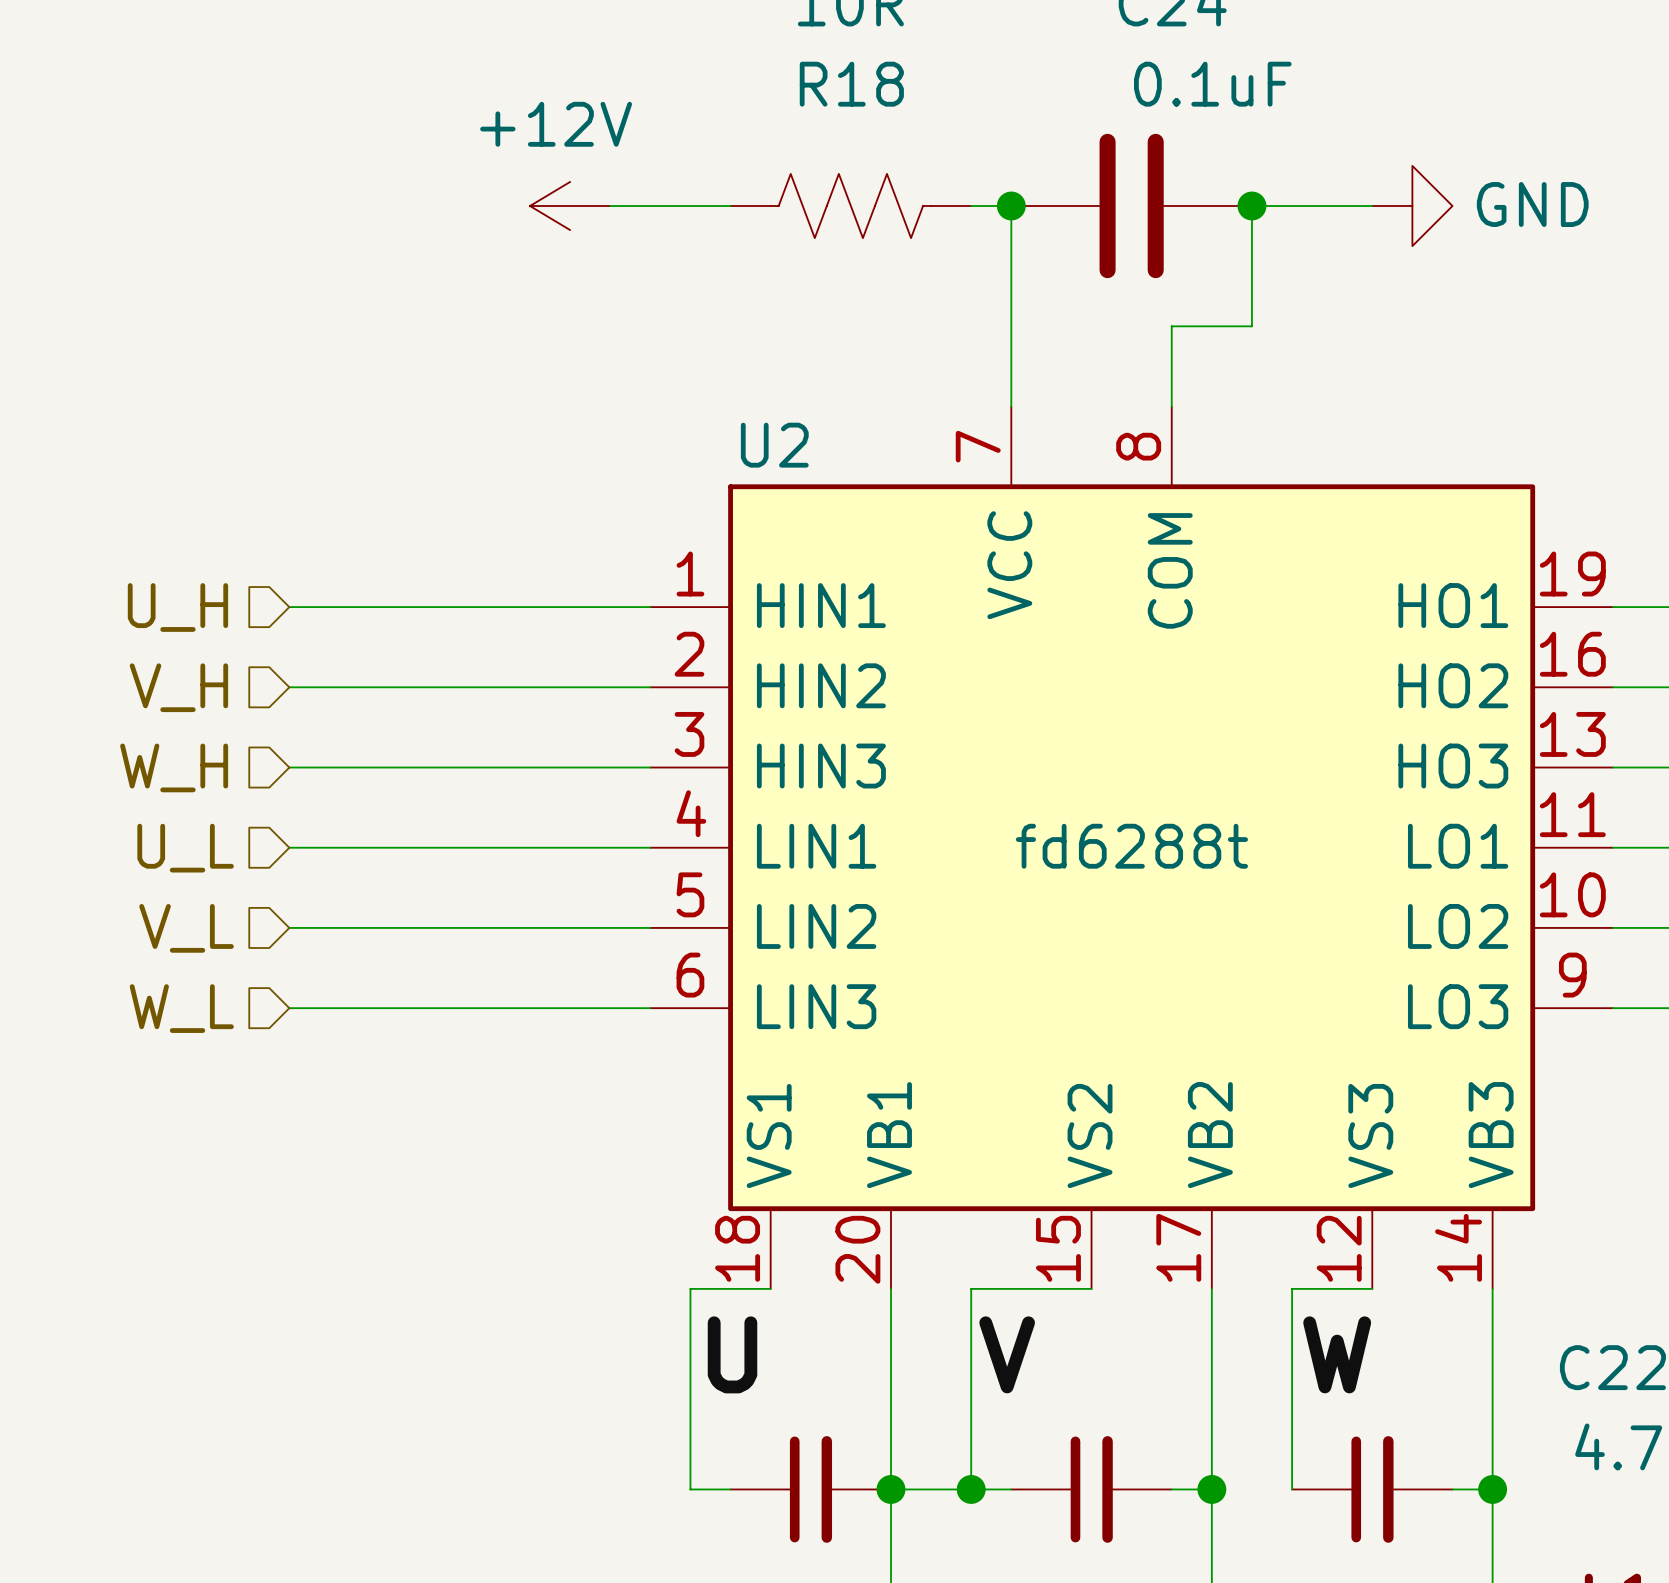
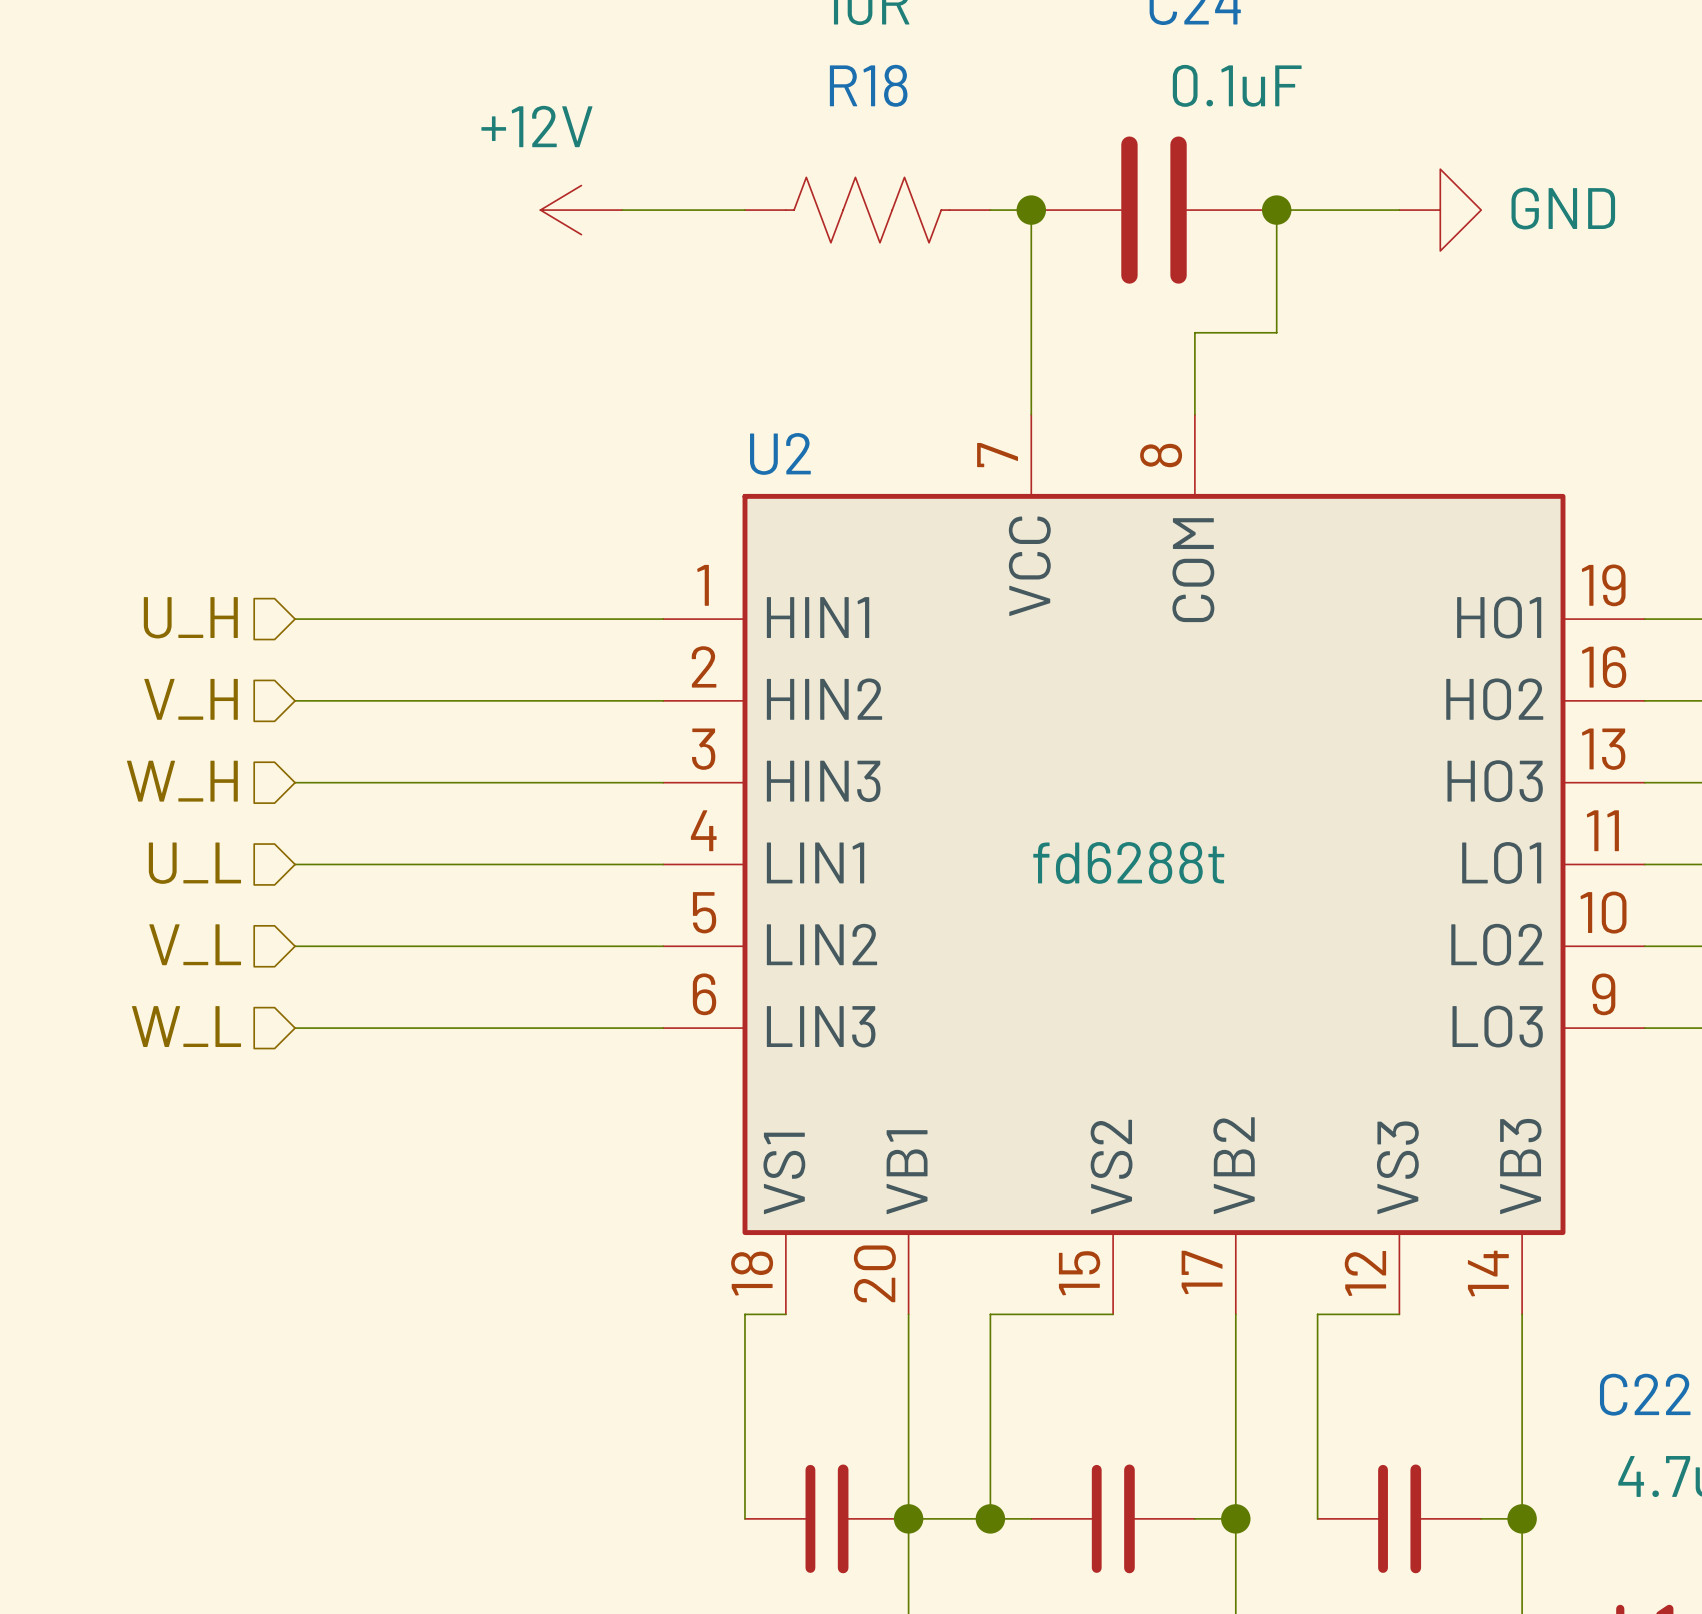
wire: (730, 1288) (690, 1288) (690, 1489) (730, 1489) -> (744, 1314) (744, 1518)
label: U (732, 1354) -> none
label: V (1007, 1354) -> none
label: W (1337, 1354) -> none

